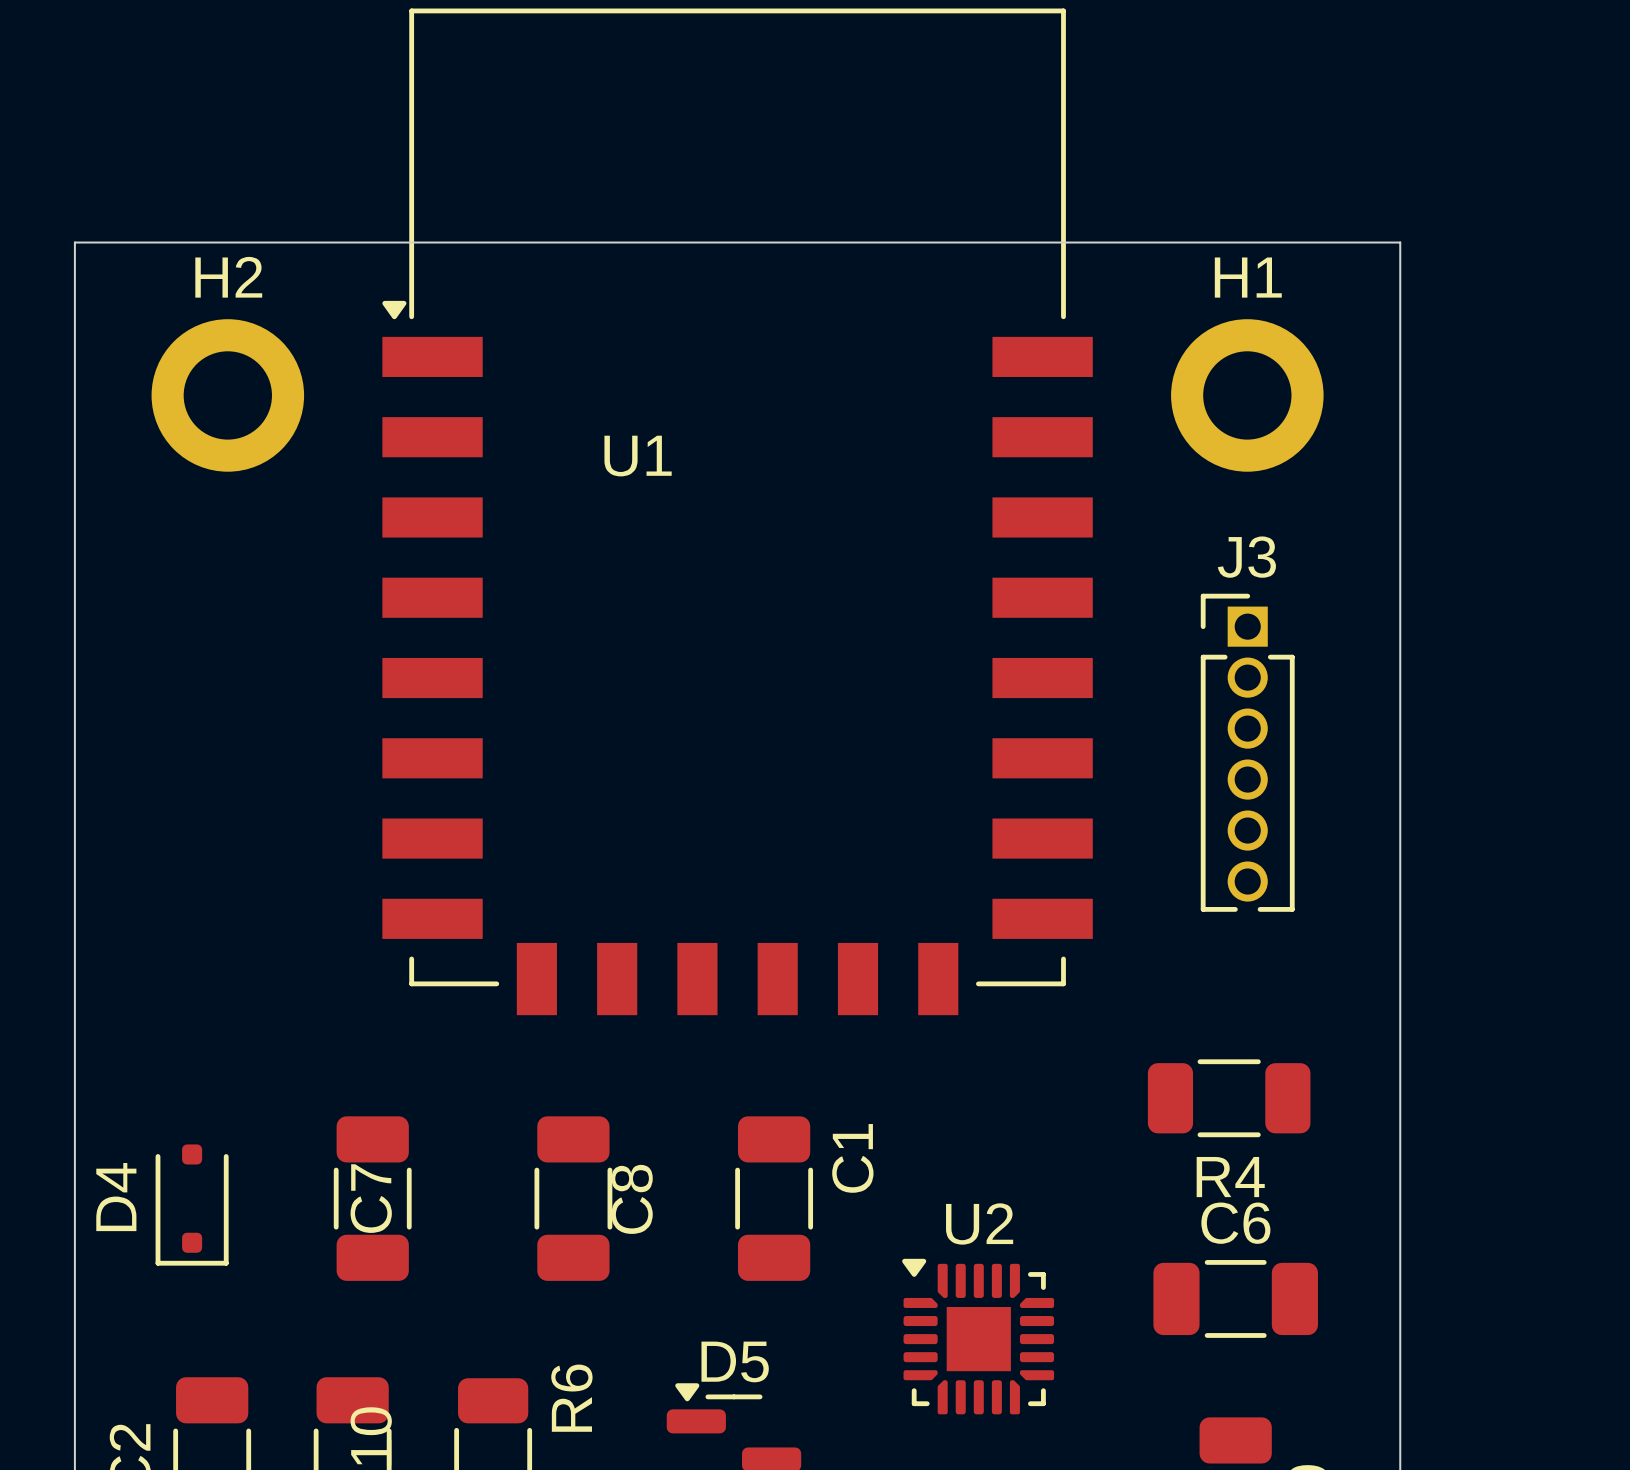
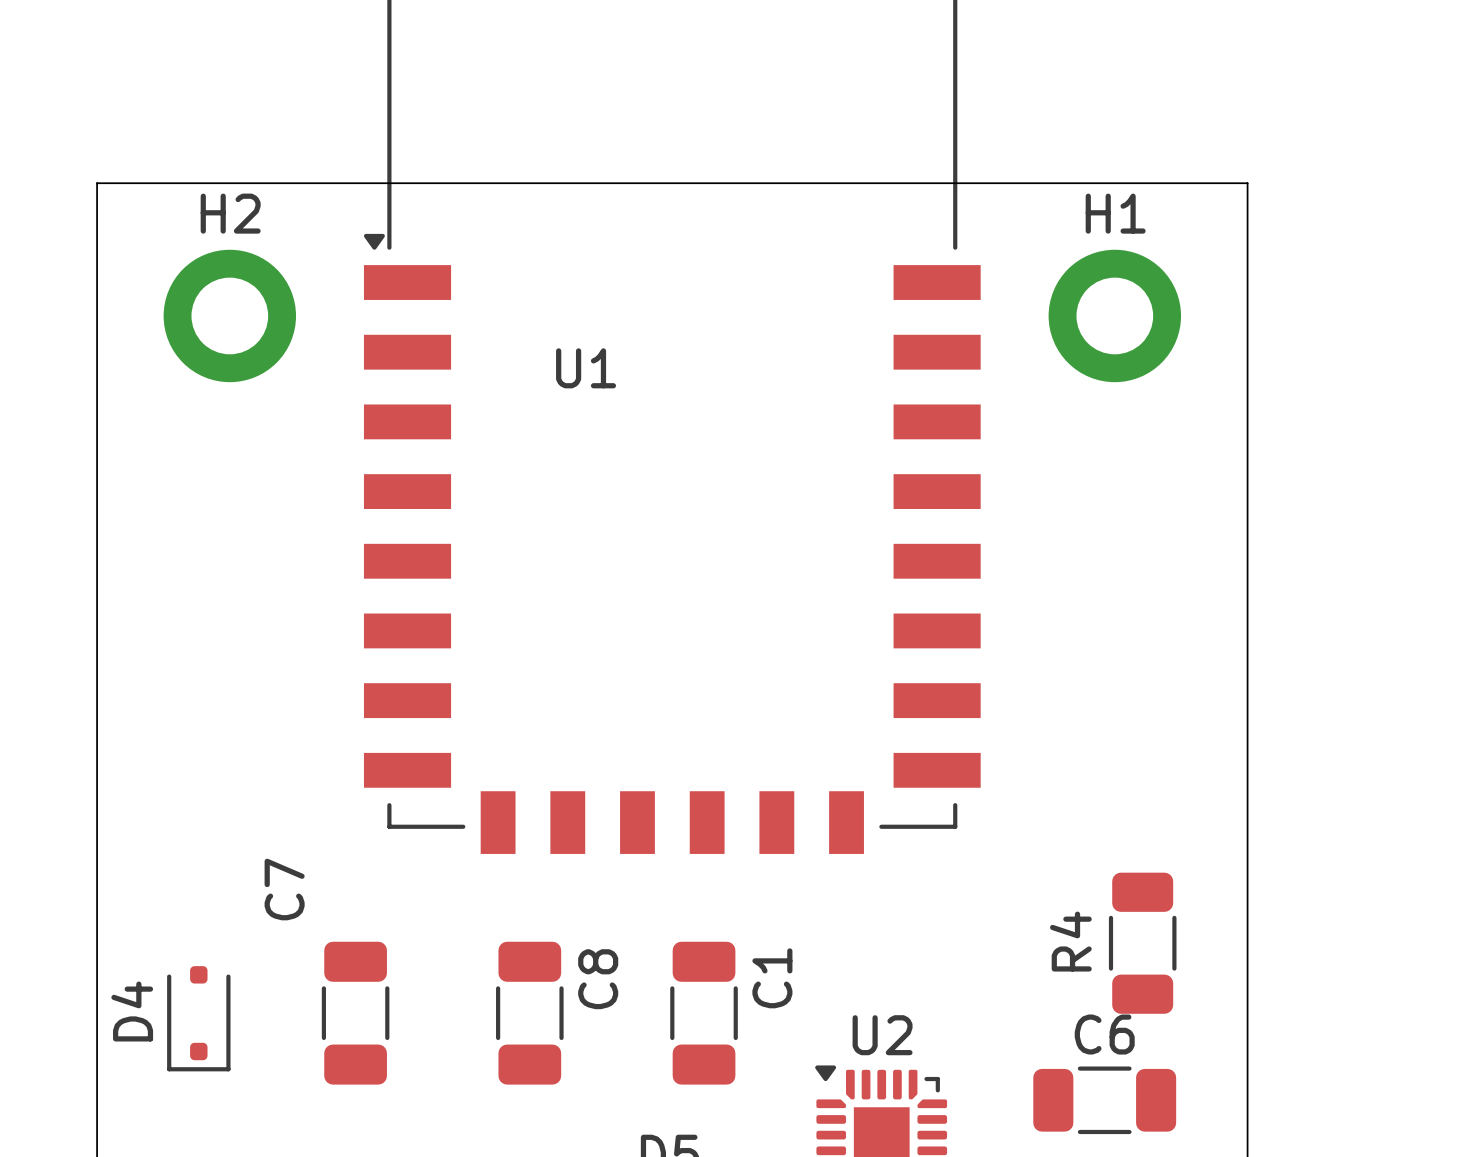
J3: (1247, 752) -> none
R4 rotation: 0° (1229, 1098) -> 90° clockwise (1142, 943)
C7 name position: C7 (371, 1198) -> C7 (284, 889)
C8 name position: C8 (632, 1199) -> C8 (598, 979)

